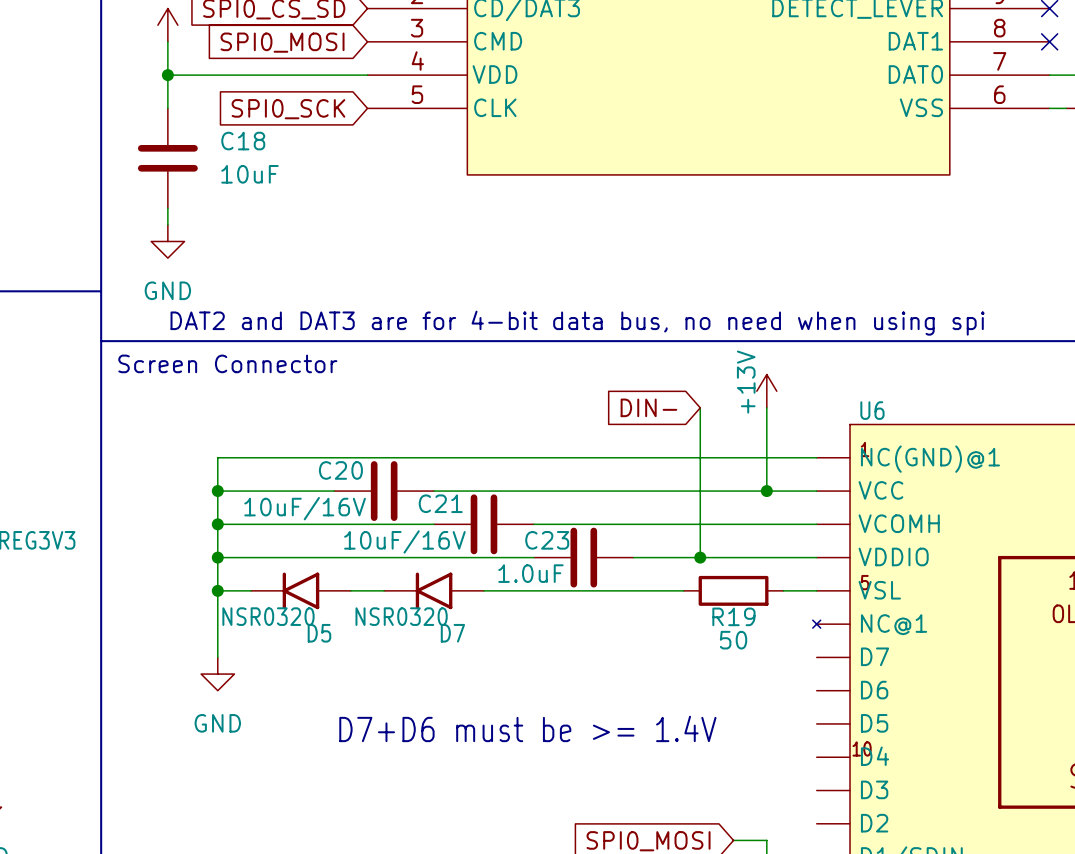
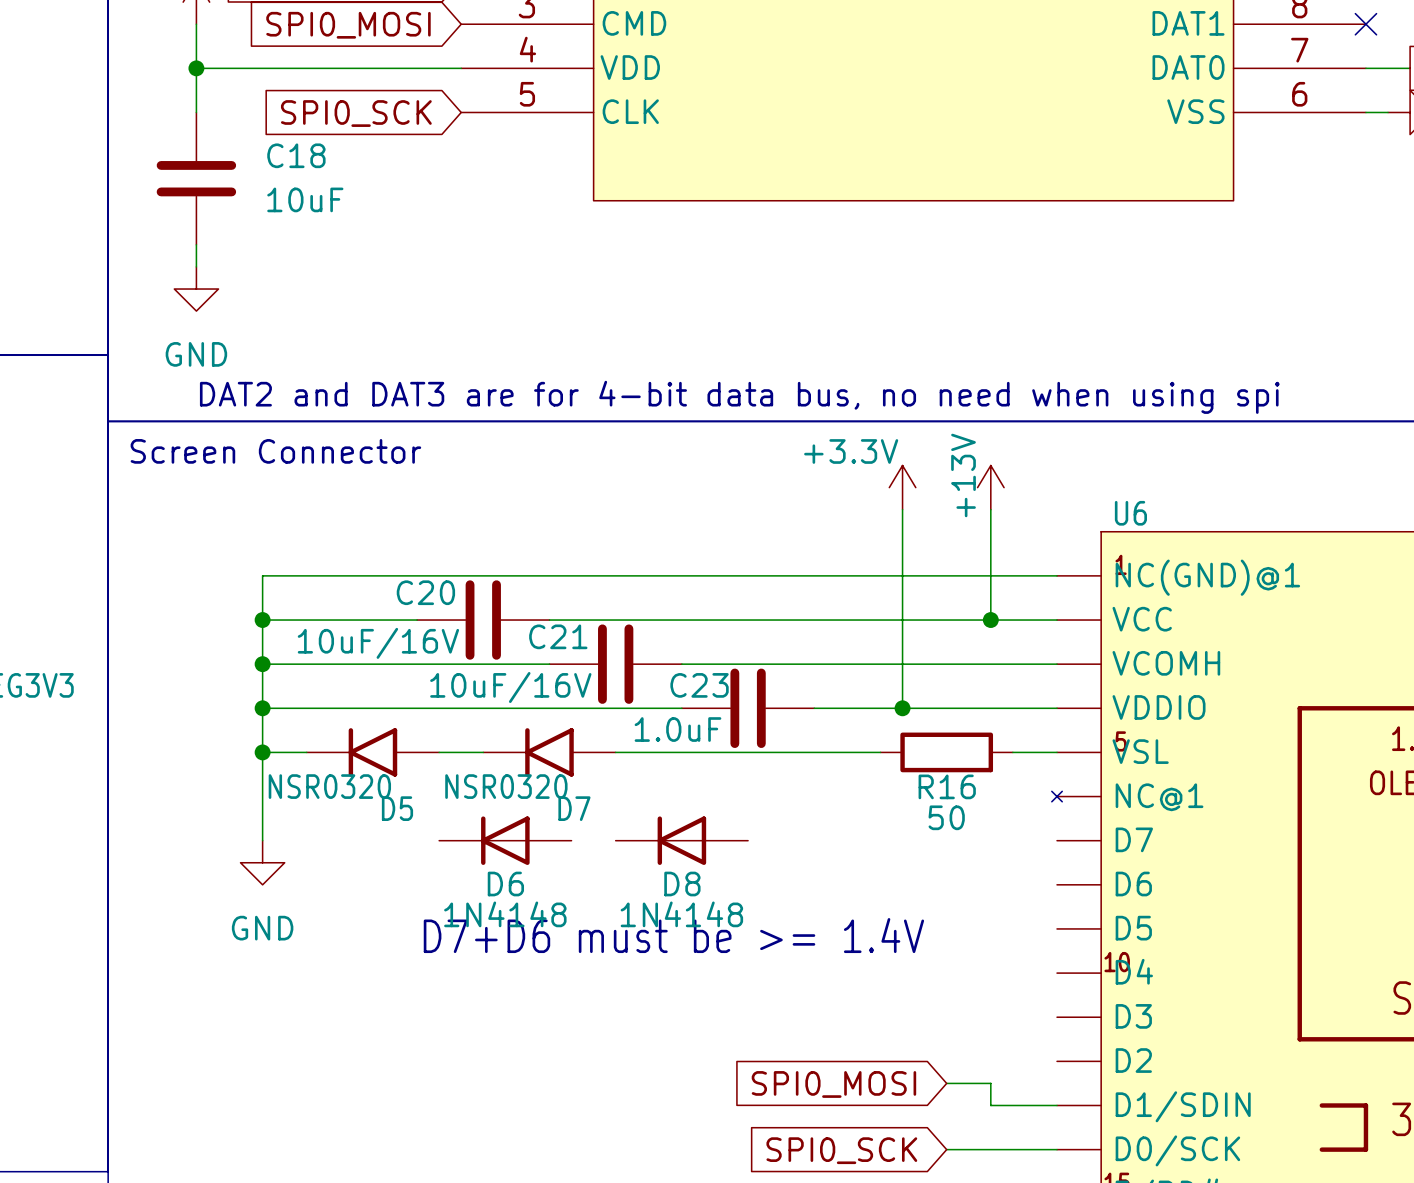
power symbol: none -> +3.3V (902, 487)
global label: DIN- (648, 407) -> none
R19 name: R19 (733, 616) -> R16 (947, 786)
D6: none -> 1N4148 (505, 840)
D8: none -> 1N4148 (681, 840)

